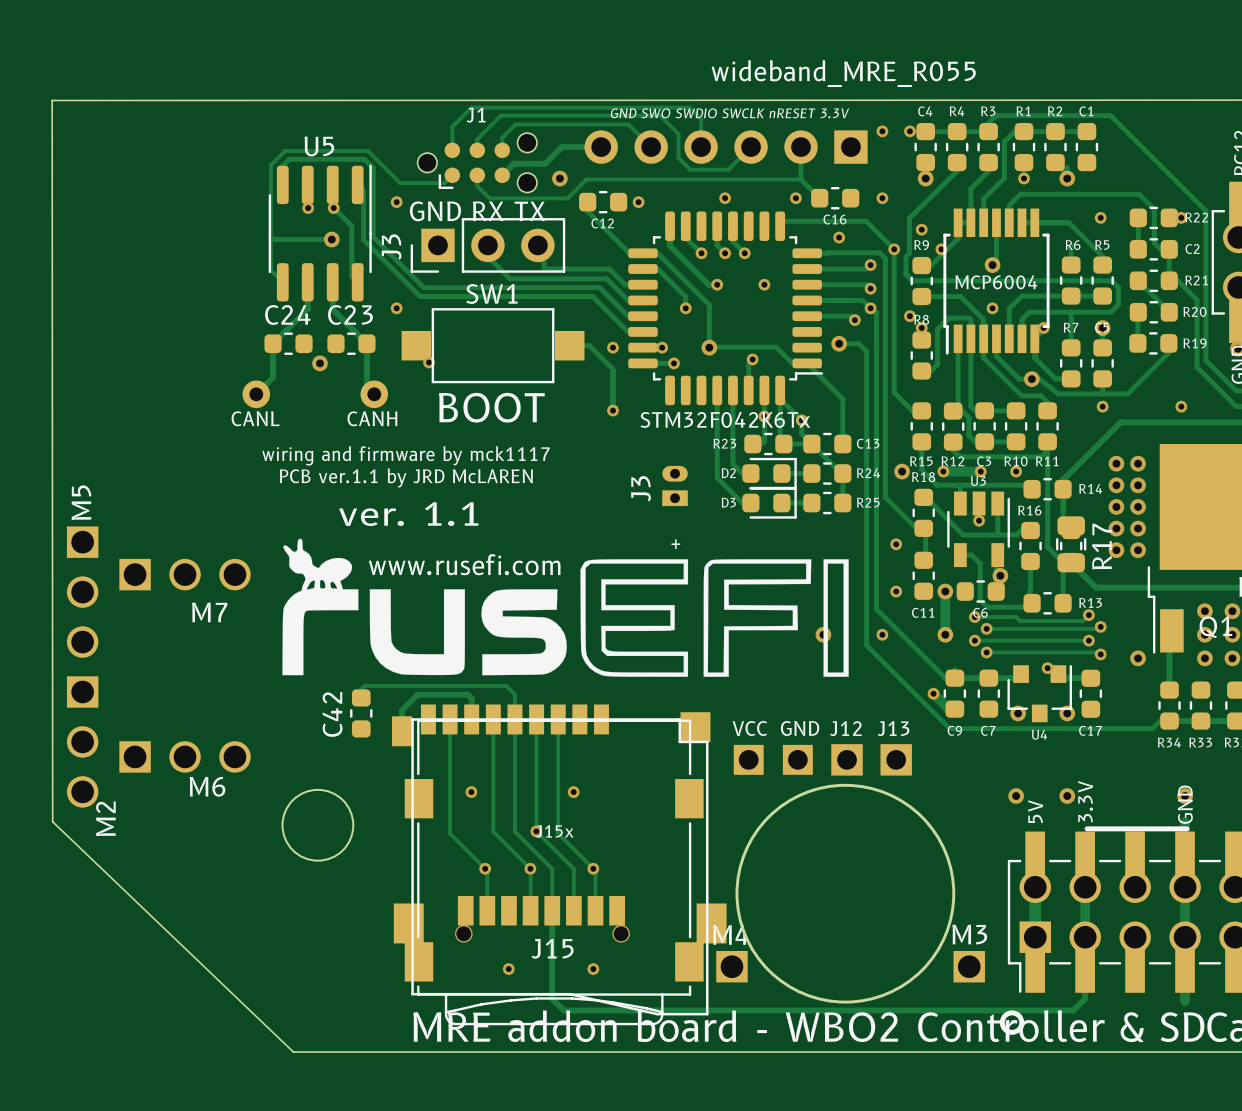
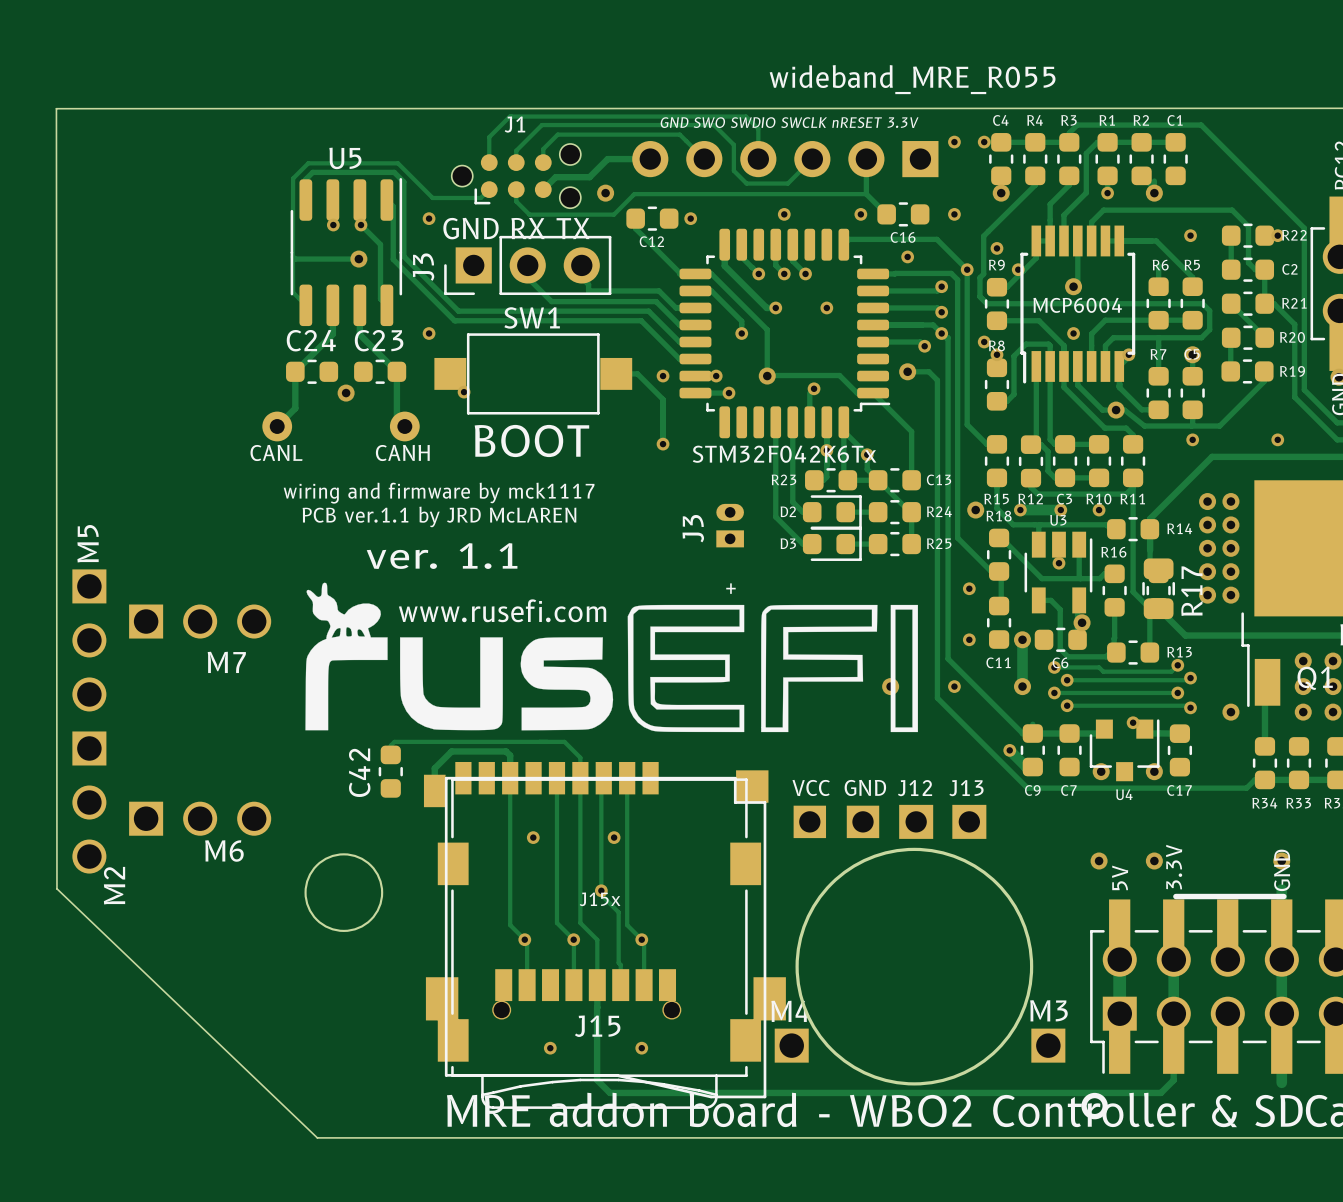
track: (506, 685) (514, 694) (514, 721) -> (547, 741) (564, 741) (580, 757) (580, 771)
track: (450, 713) (450, 833) (471, 855) -> (510, 778) (510, 925)
track: (558, 713) (558, 833) (579, 855) -> (627, 778) (627, 925)
track: (493, 719) (493, 831) (514, 853) -> (556, 898) (556, 922)
via: none -> (614, 837)
via position: (471, 792) -> (533, 837)
via: (573, 792) -> none
via: none -> (601, 890)
track: (514, 831) (536, 853) -> (580, 899) (580, 922)
track: (536, 831) (573, 868) (573, 892) -> (603, 778) (601, 780) (601, 895) (618, 912) (618, 962) (620, 964)
via: (536, 831) -> none

